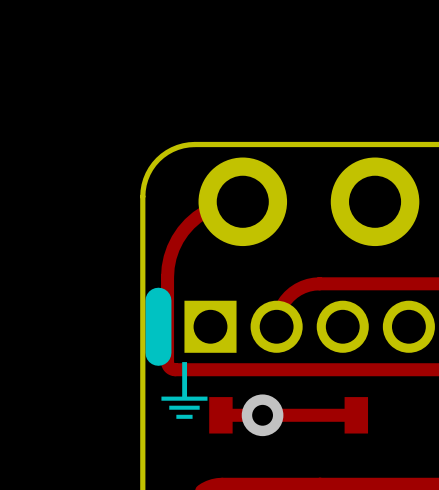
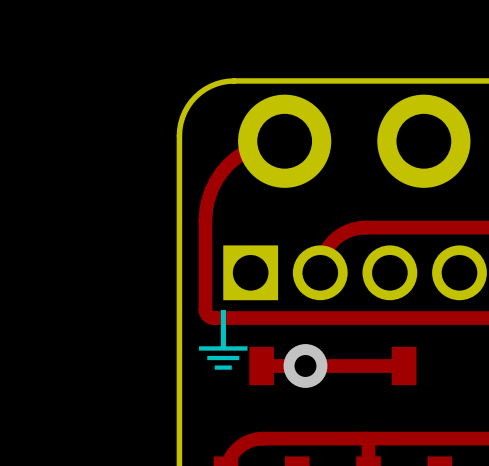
line: (158, 300) (158, 352) -> none

